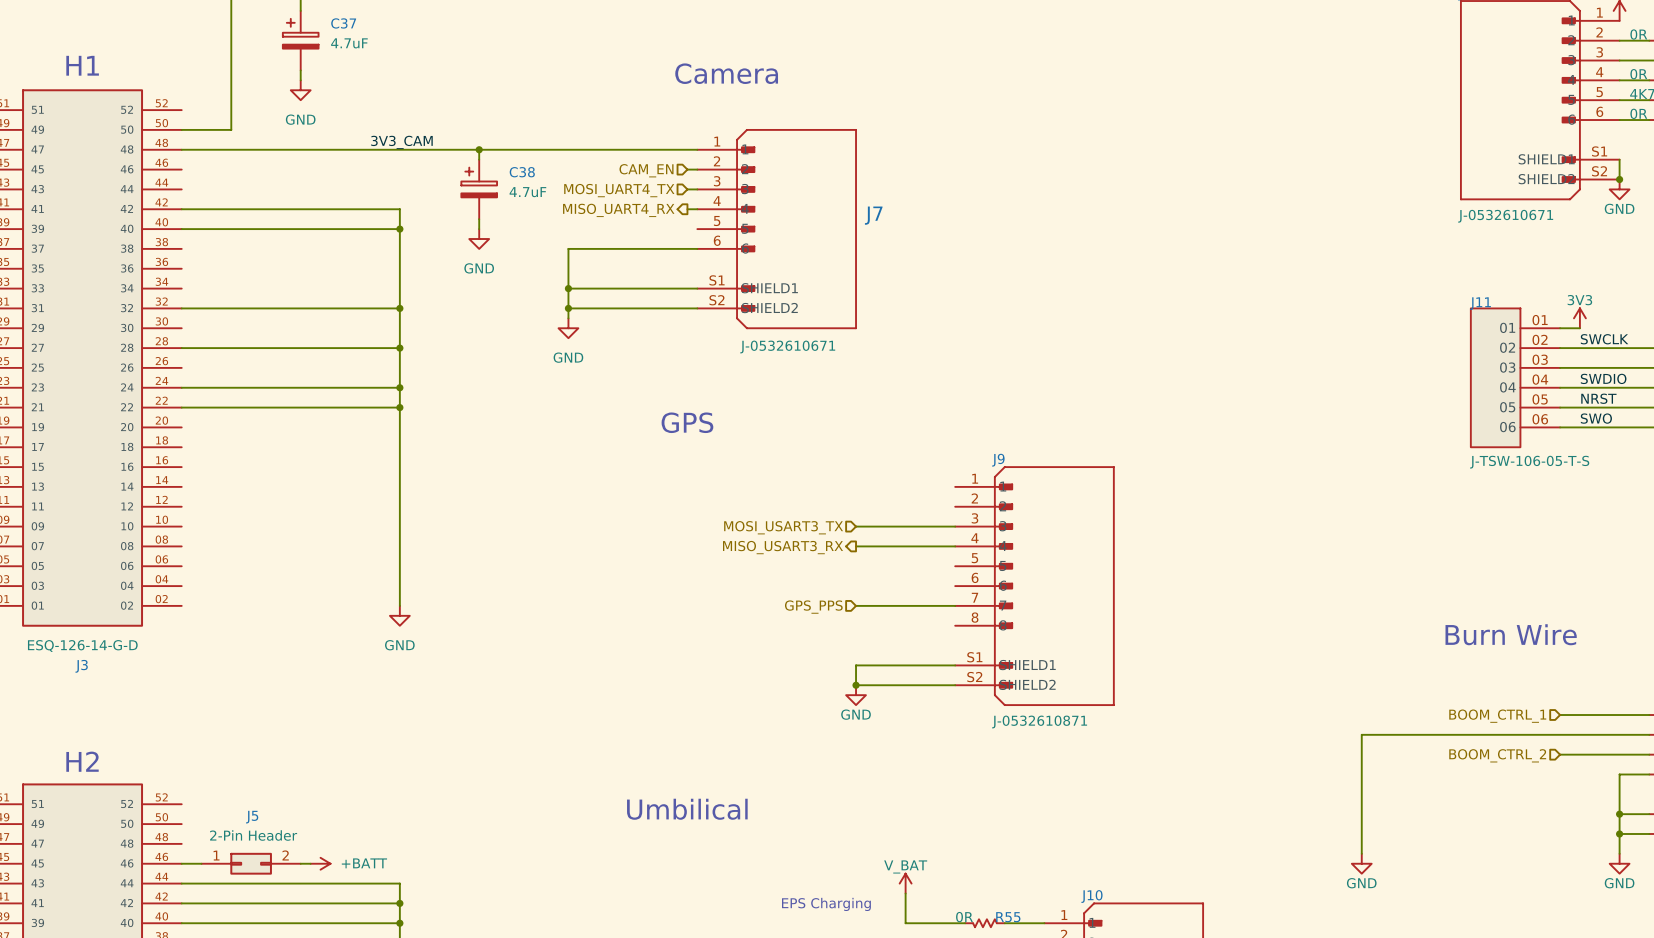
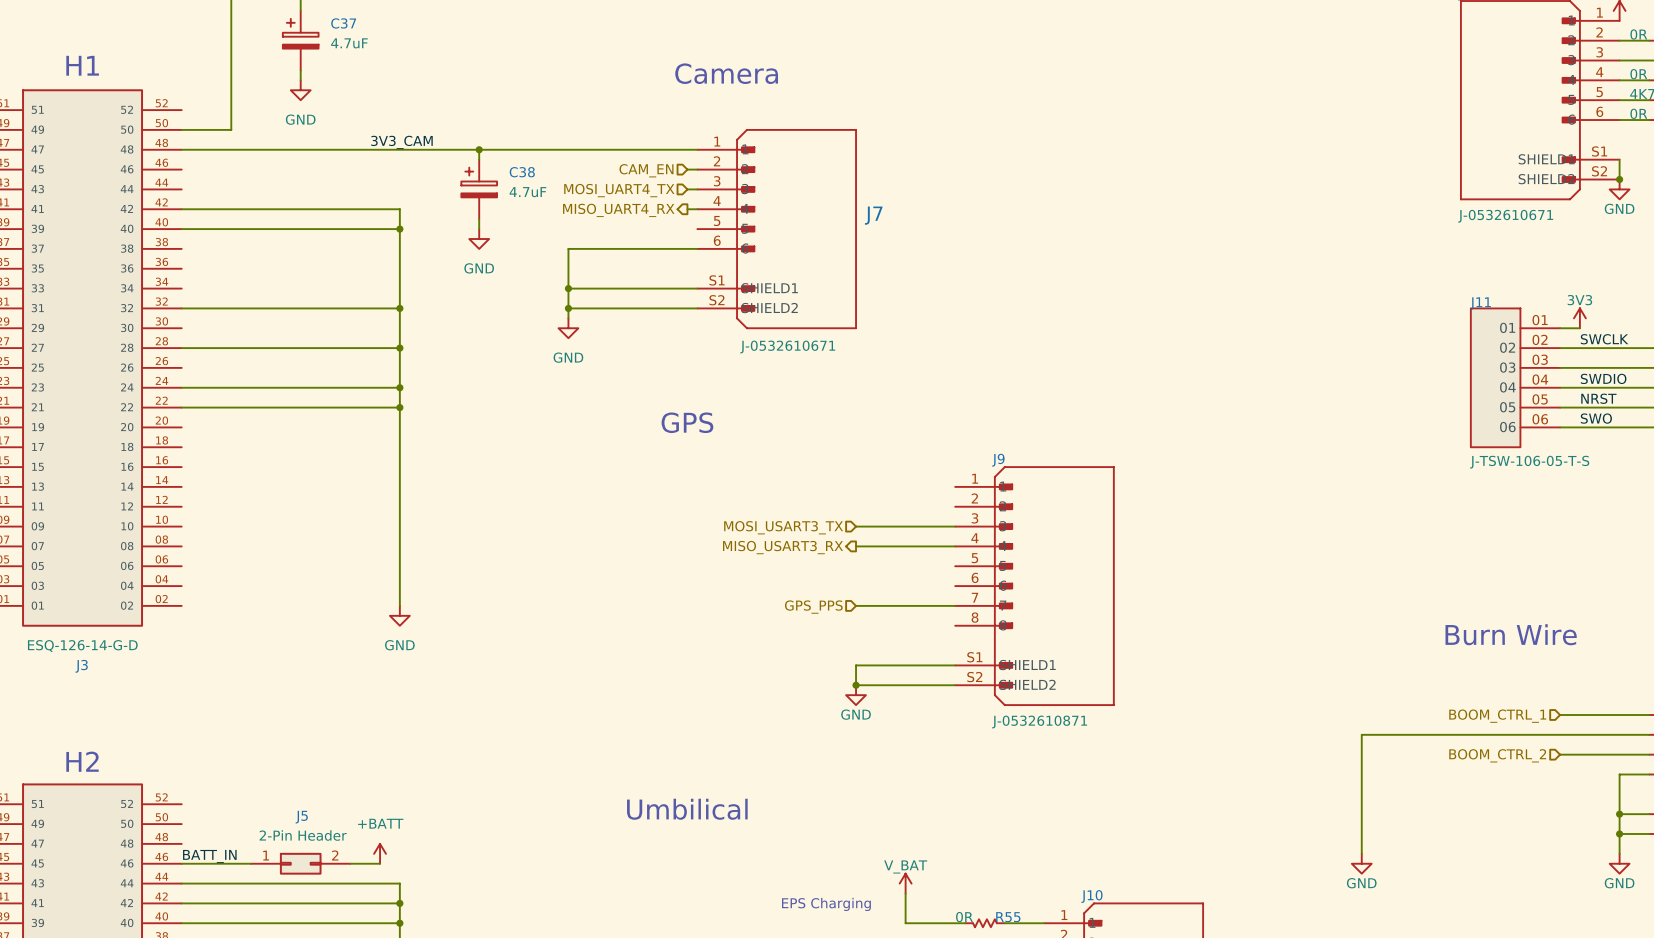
label: none -> BATT_IN (209, 856)
J5 position: (251, 863) -> (300, 863)
power symbol rotation: 0° (320, 863) -> 90° counterclockwise (380, 853)
power symbol position: +BATT (320, 863) -> +BATT (380, 853)
wire: none -> (350, 863) (380, 863)
power symbol text position: +BATT (364, 863) -> +BATT (380, 823)

